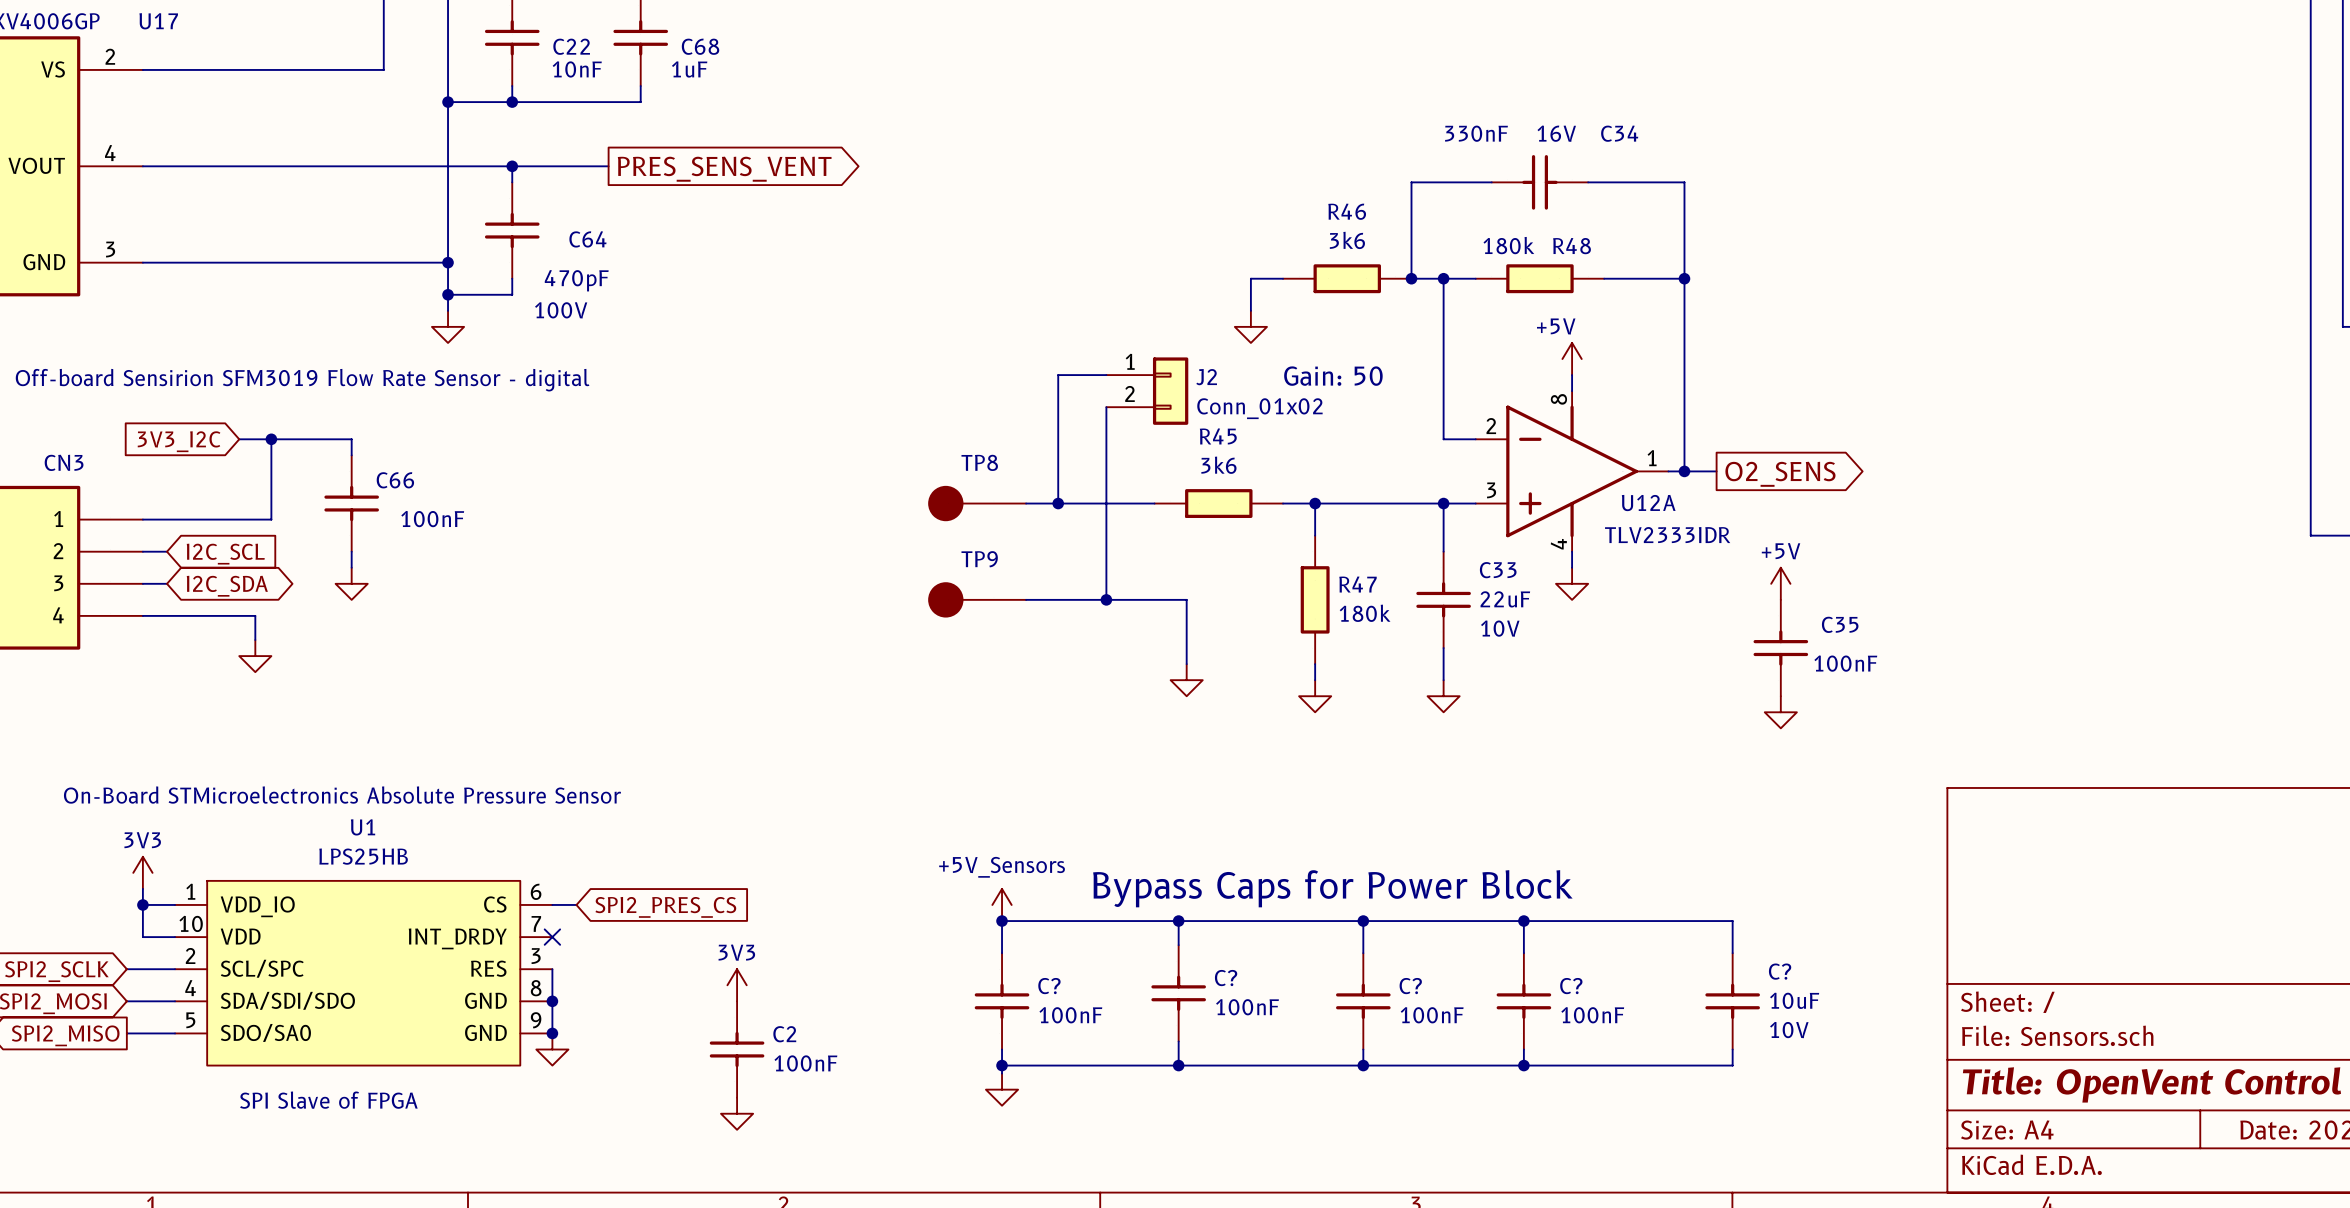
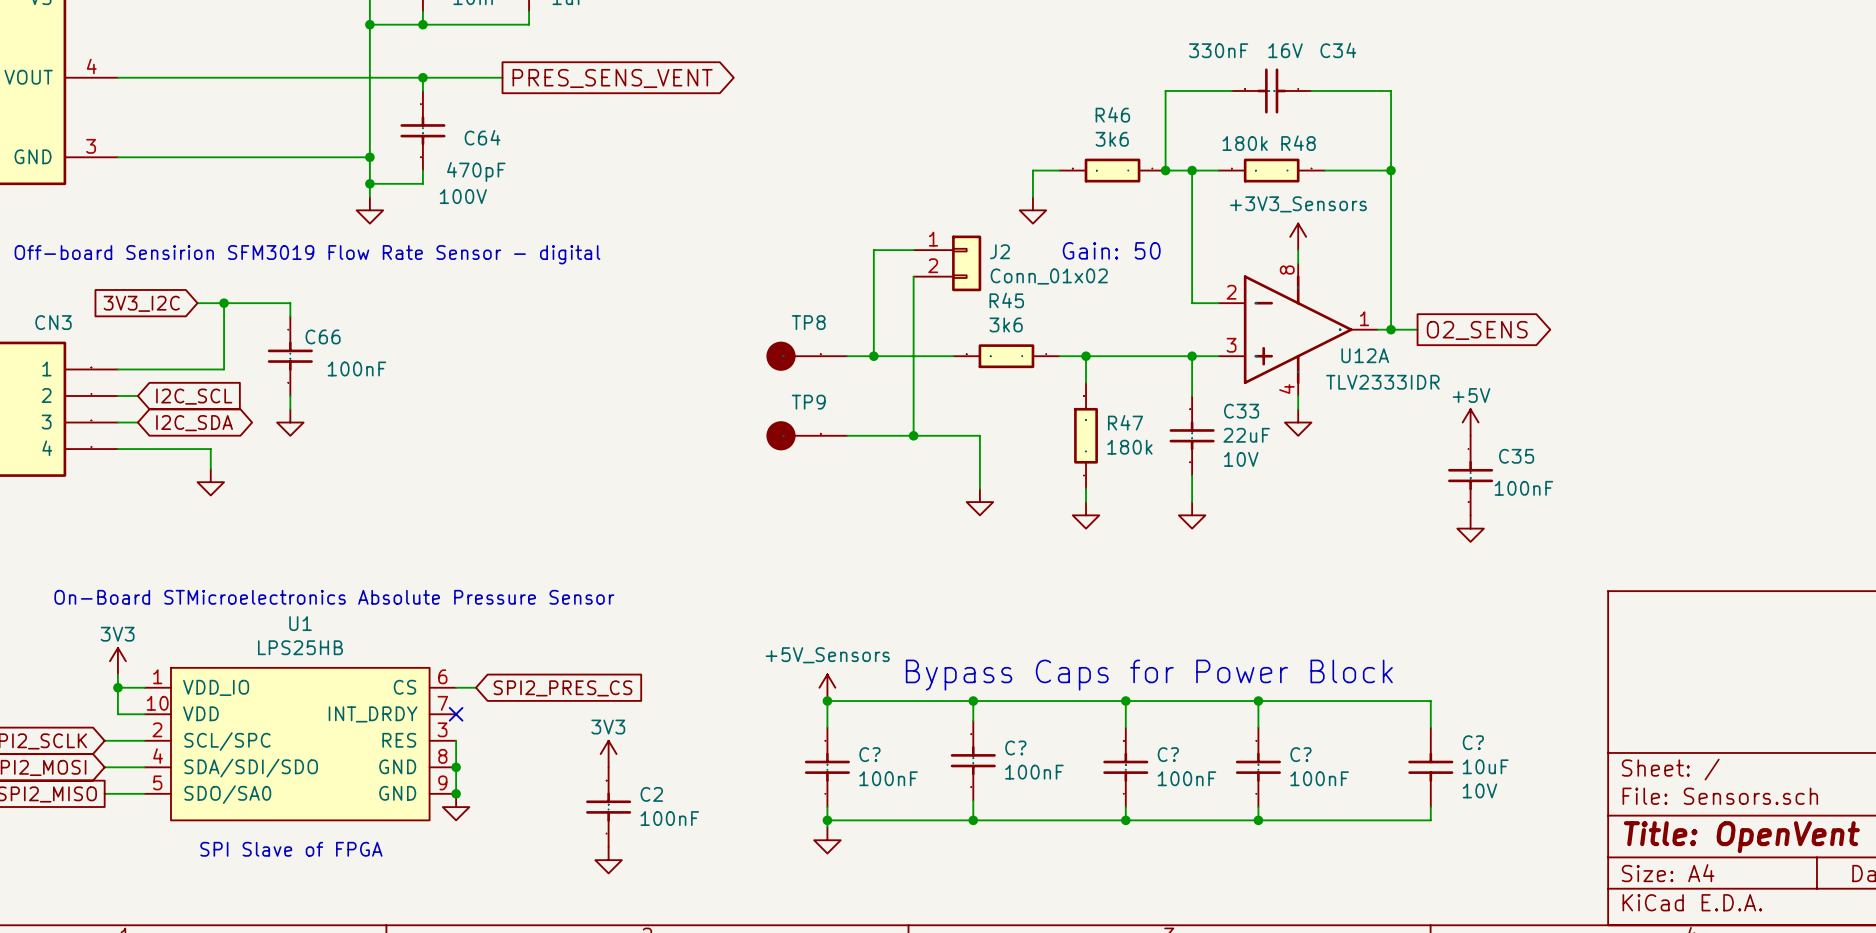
power symbol: +5V (1572, 359) -> +3V3_Sensors (1298, 236)

